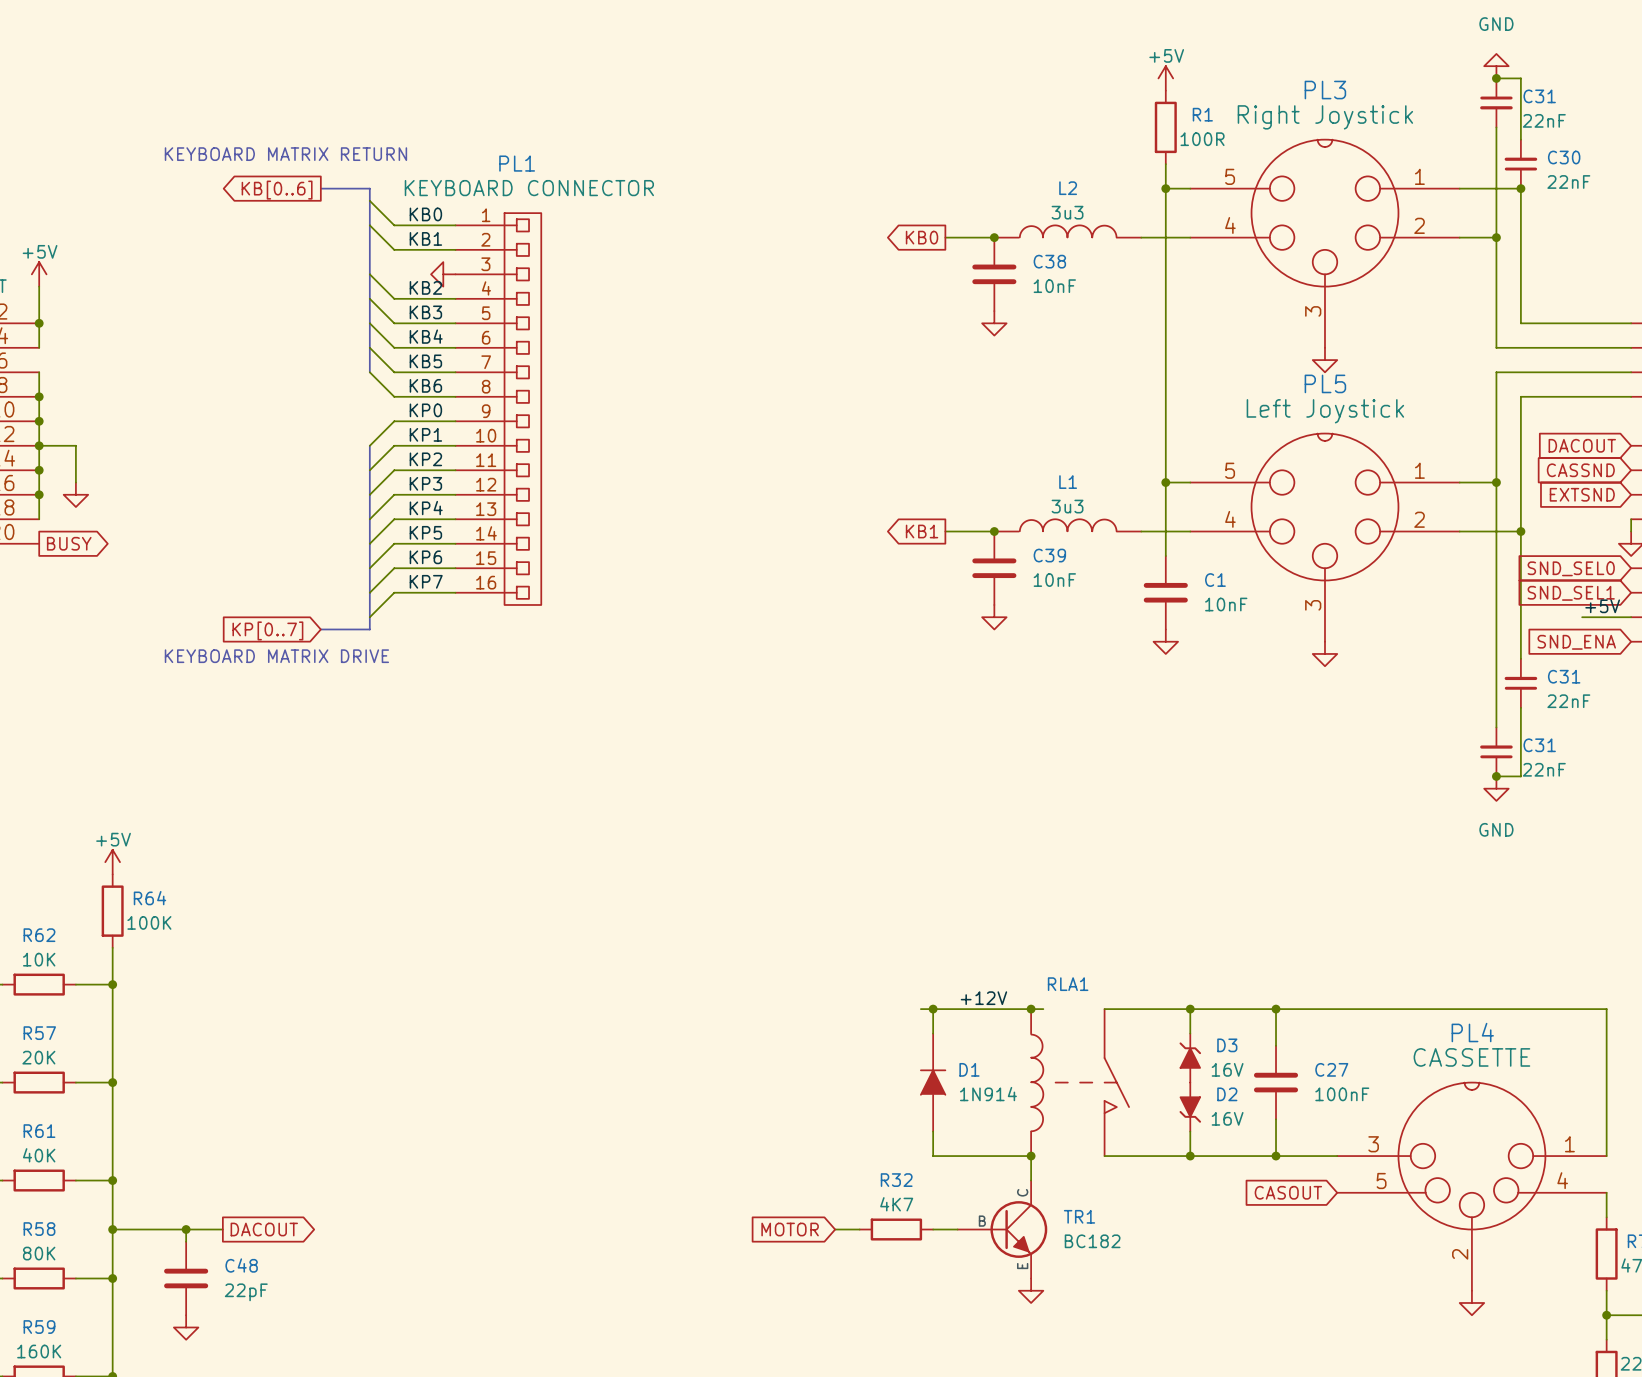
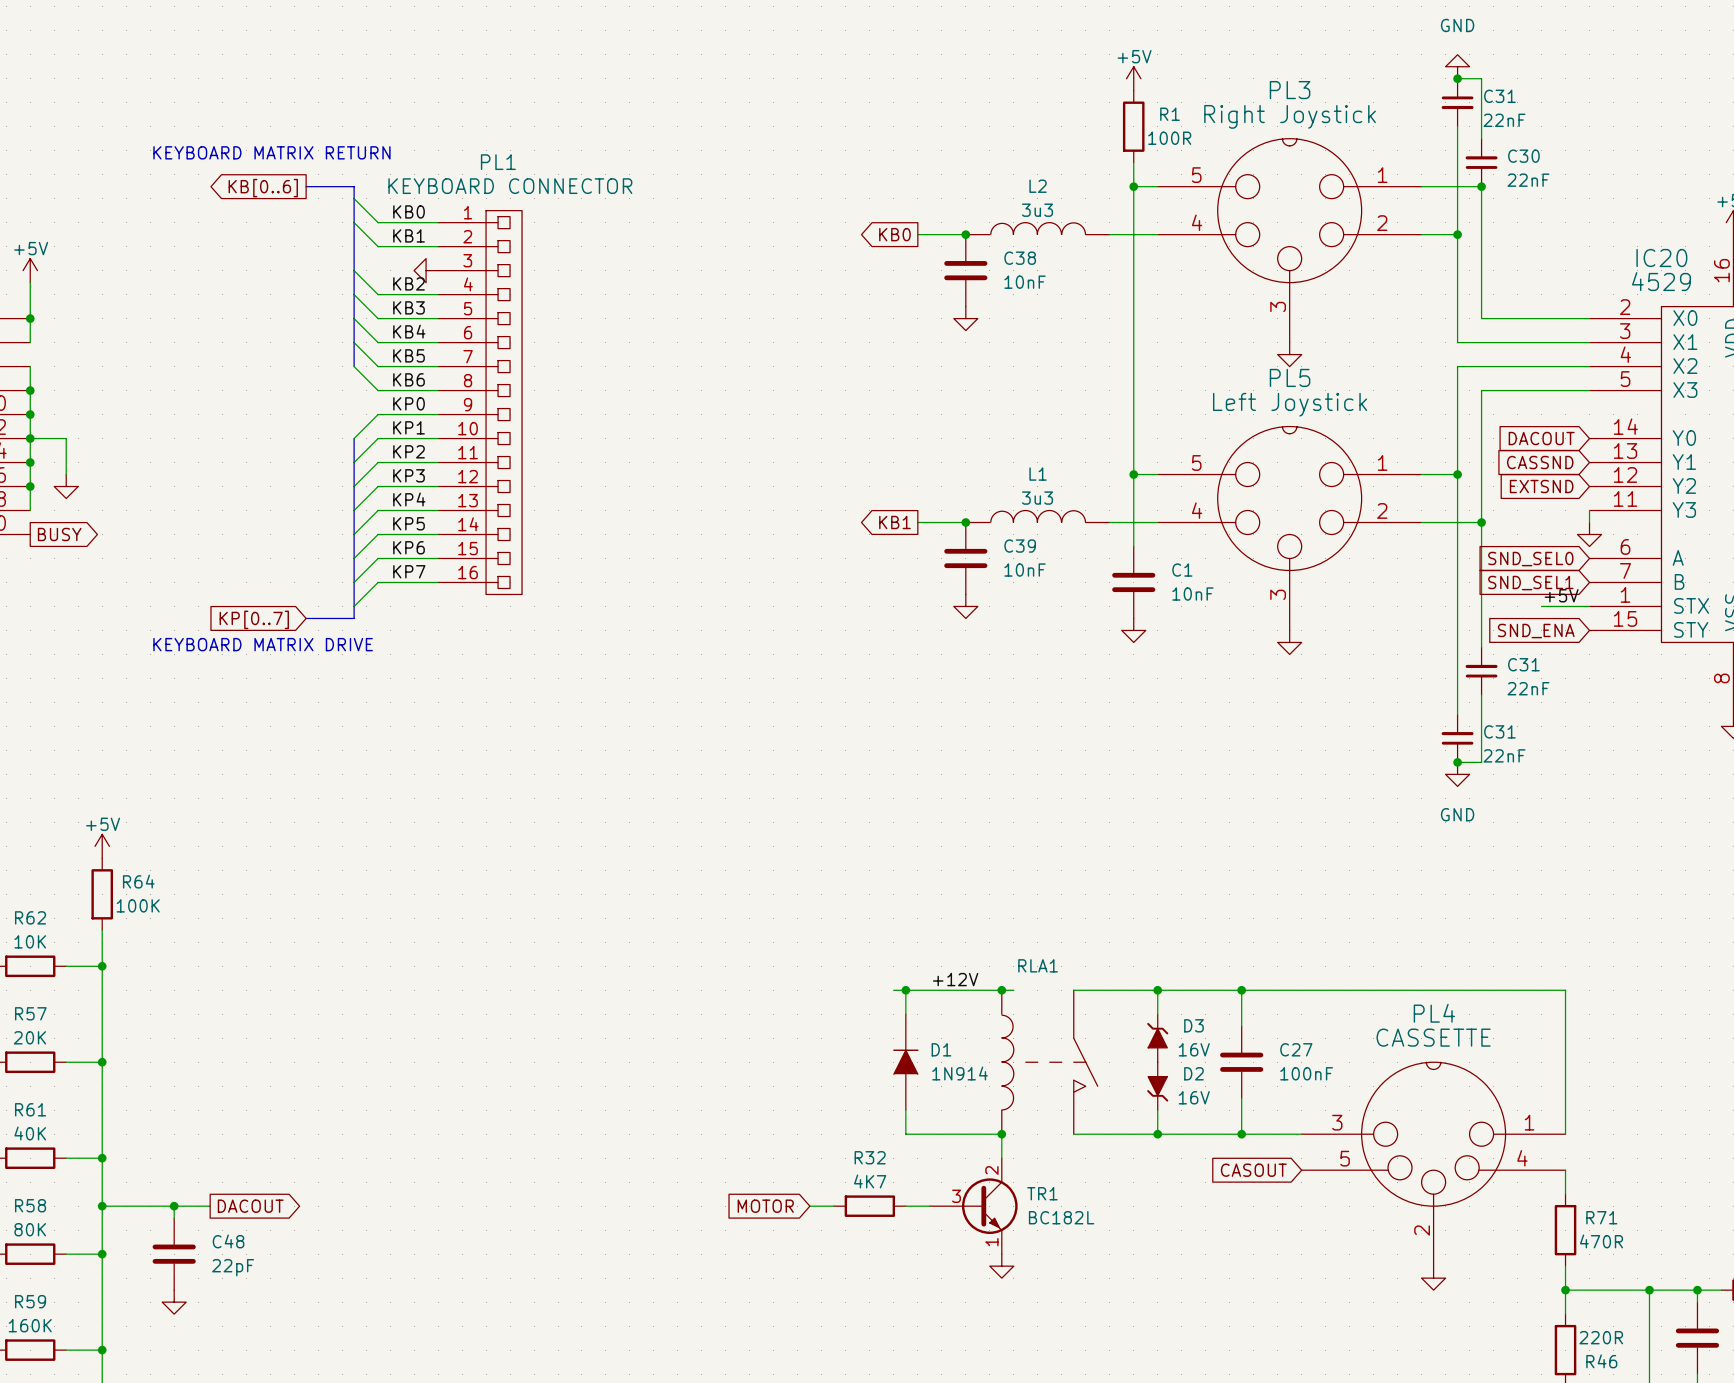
TR1 symbol: [957, 1180, 1048, 1279] -> [929, 1158, 1018, 1255]
TR1 value: BC182 (1092, 1241) -> BC182L (1061, 1217)

